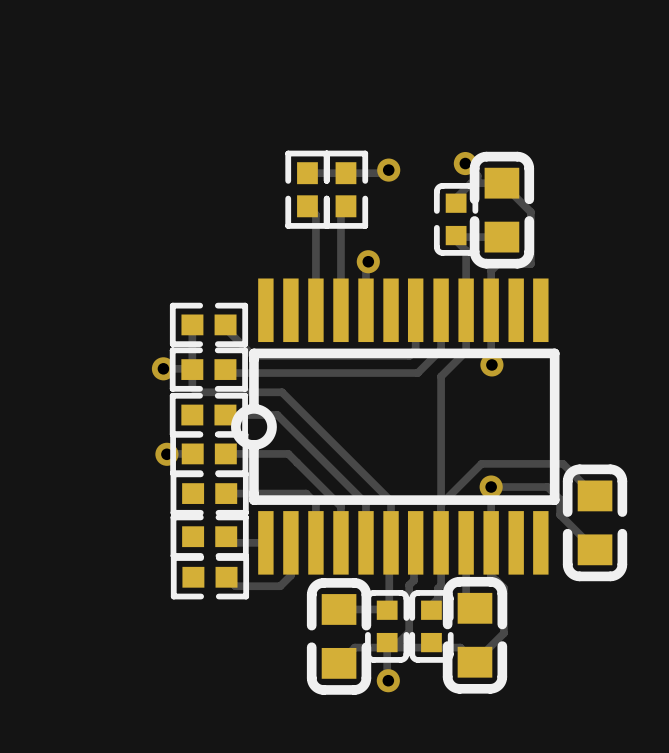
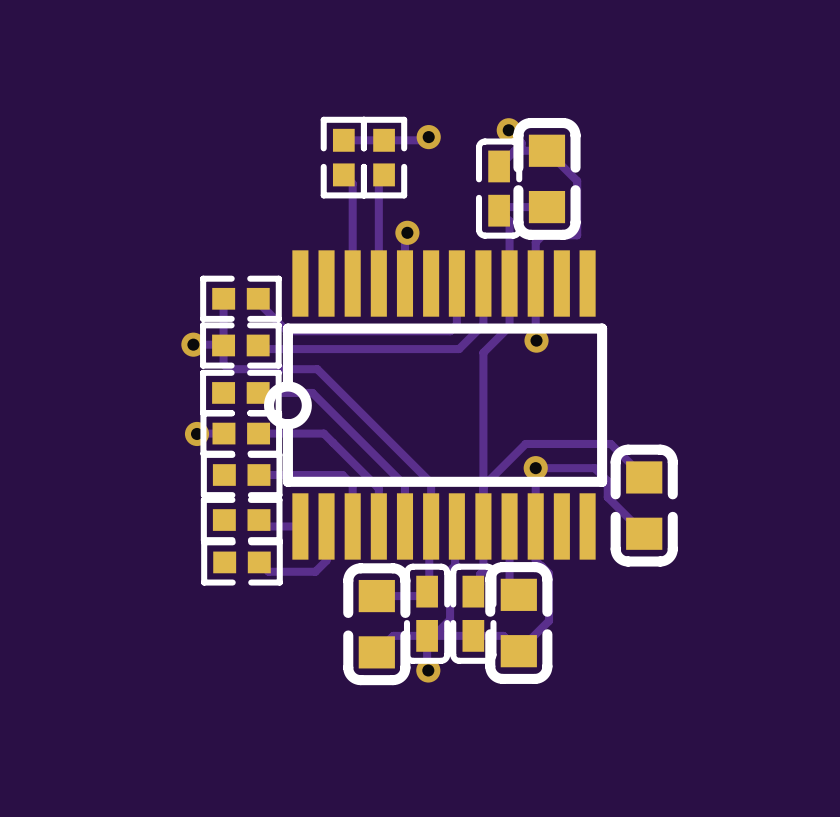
part footprint: [433, 182, 479, 256] -> [475, 138, 523, 239]
part footprint: [365, 590, 410, 663] -> [403, 563, 451, 664]
part footprint: [409, 590, 454, 663] -> [450, 563, 497, 664]

